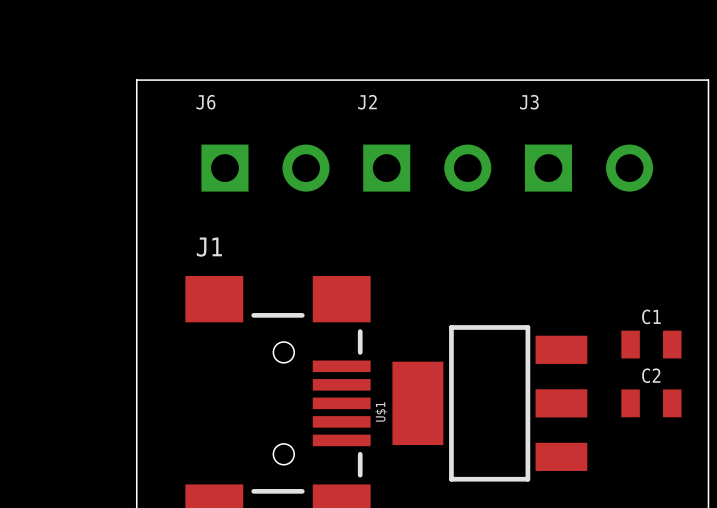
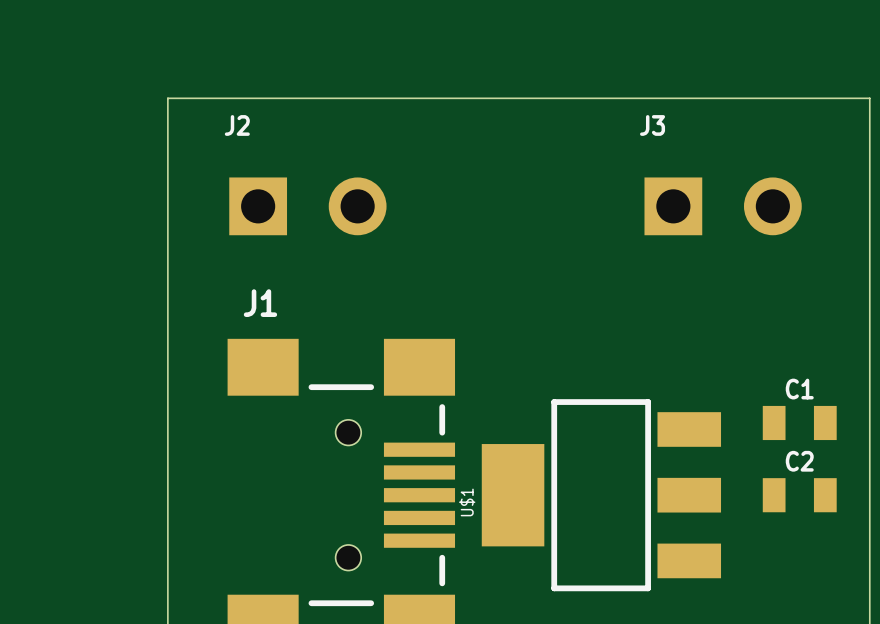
J6: (265, 168) -> none
J2 position: (427, 168) -> (307, 206)

